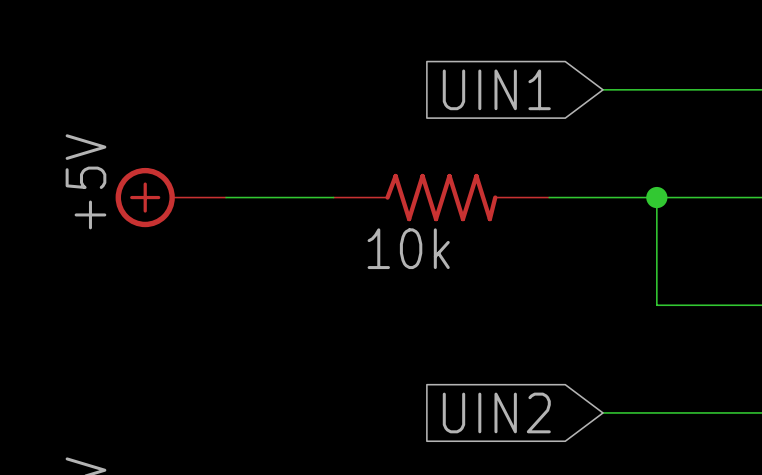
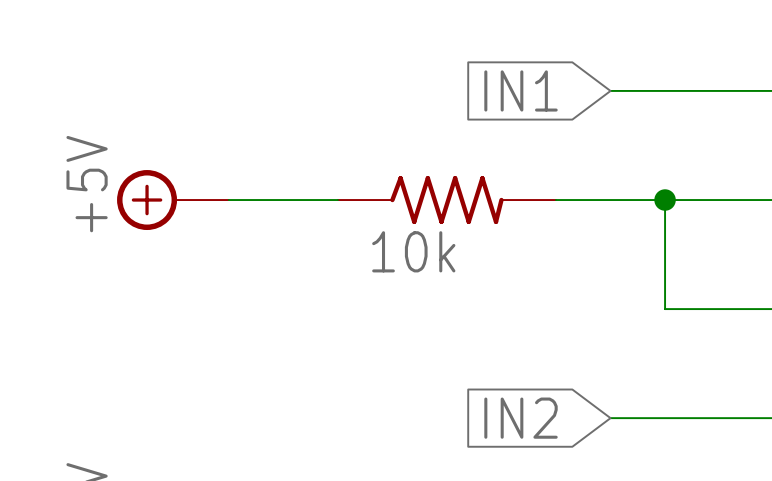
global label: UIN1 (496, 89) -> IN1 (521, 90)
global label: UIN2 (496, 412) -> IN2 (521, 418)

